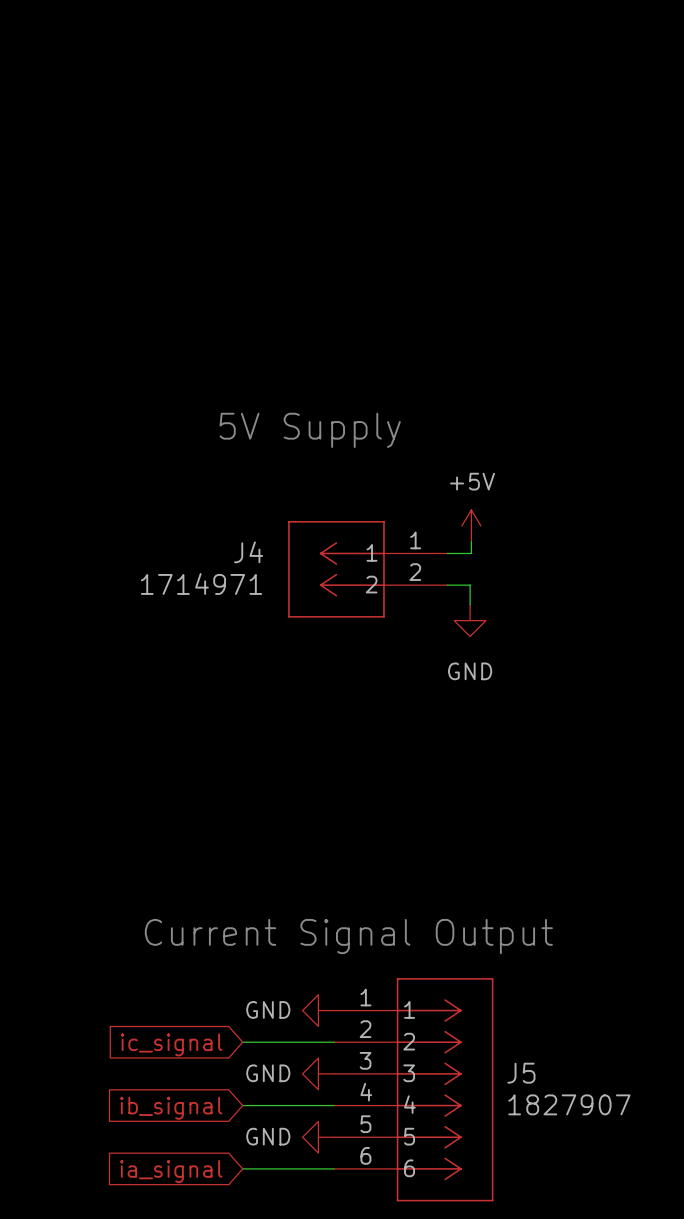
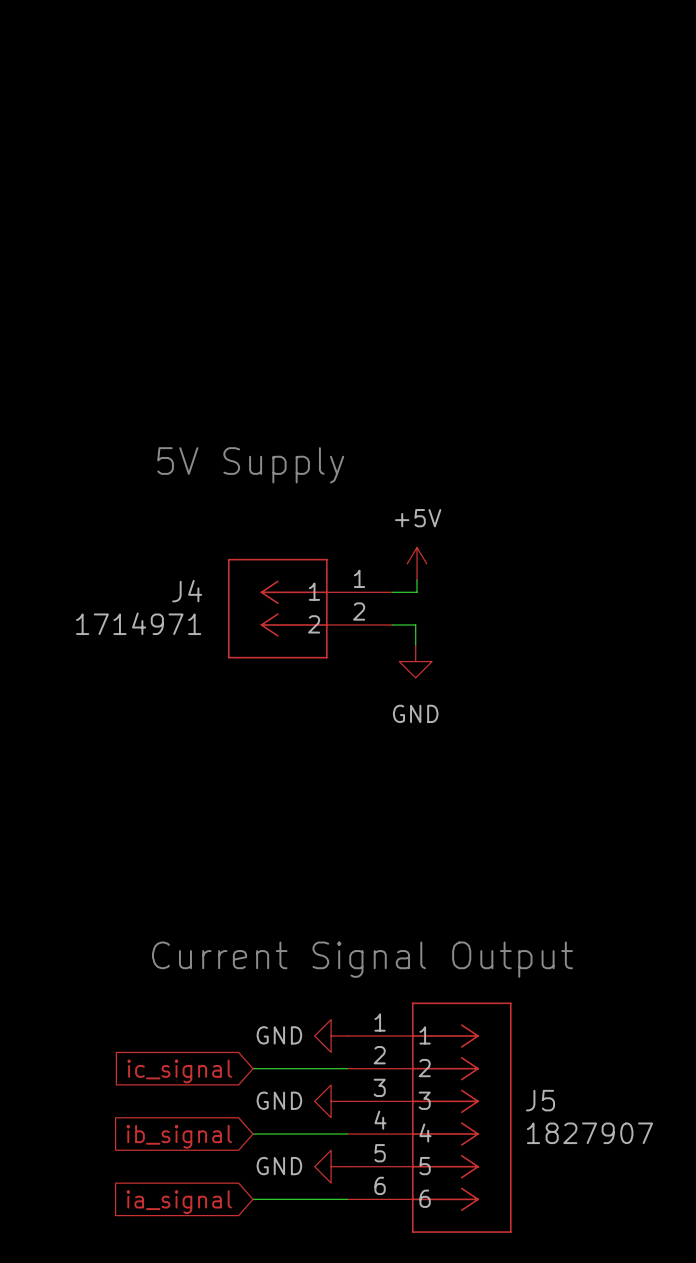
text position: 5V Supply (310, 430) -> 5V Supply (250, 465)
power symbol position: +5V (471, 525) -> +5V (417, 563)
wire: (471, 541) (471, 553) (447, 553) -> (417, 580) (417, 592) (392, 592)
J4 position: (367, 569) -> (310, 608)
wire: (447, 585) (470, 585) (470, 604) -> (392, 624) (415, 624) (415, 645)
power symbol position: GND (470, 620) -> GND (415, 661)

